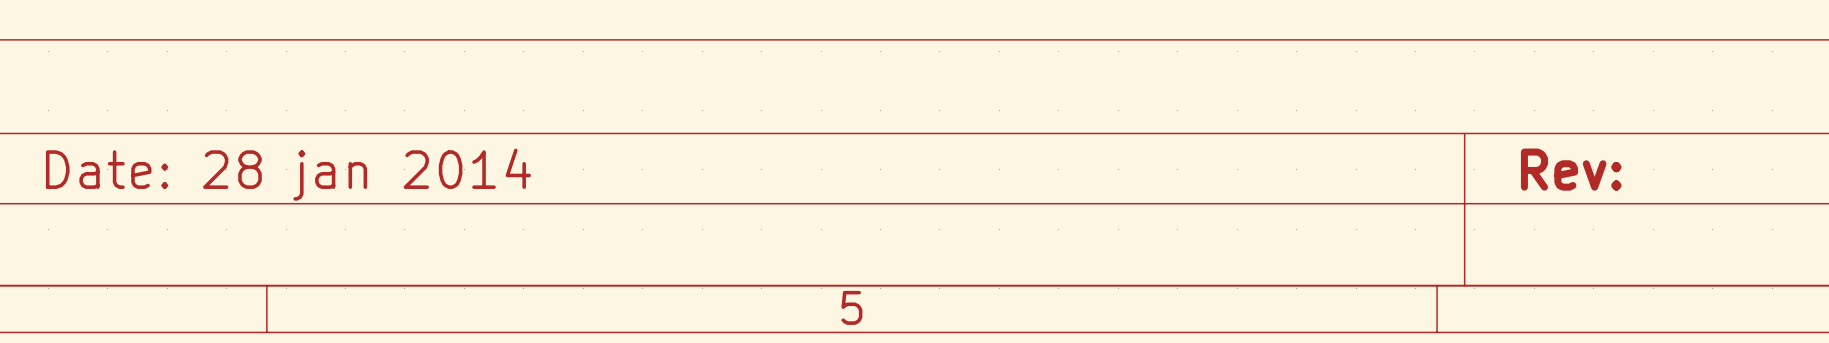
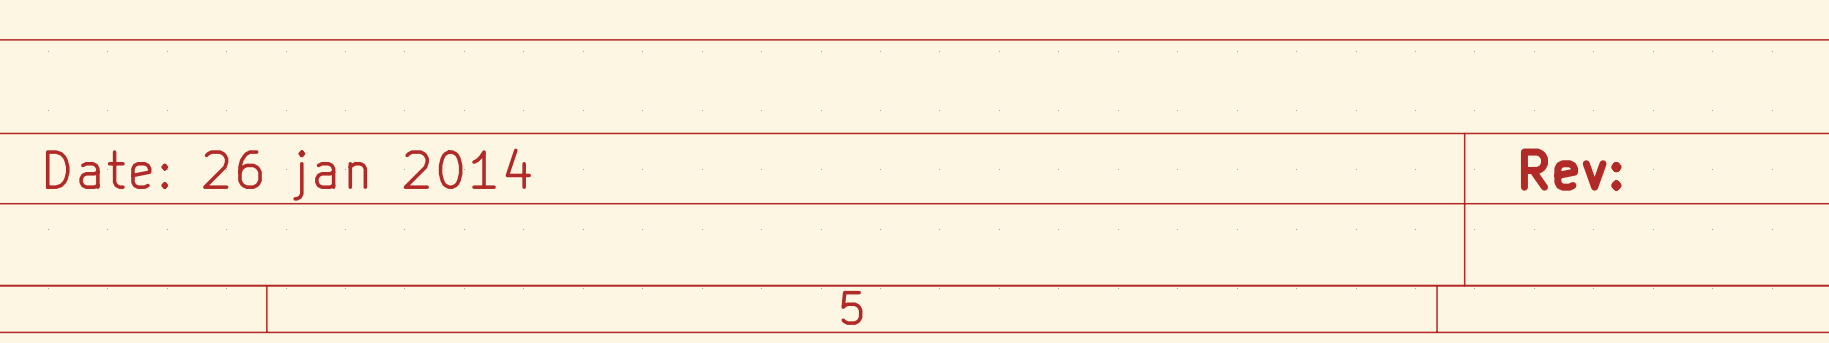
title block: Date: 28 jan 2014 (288, 174) -> Date: 26 jan 2014 (288, 174)

